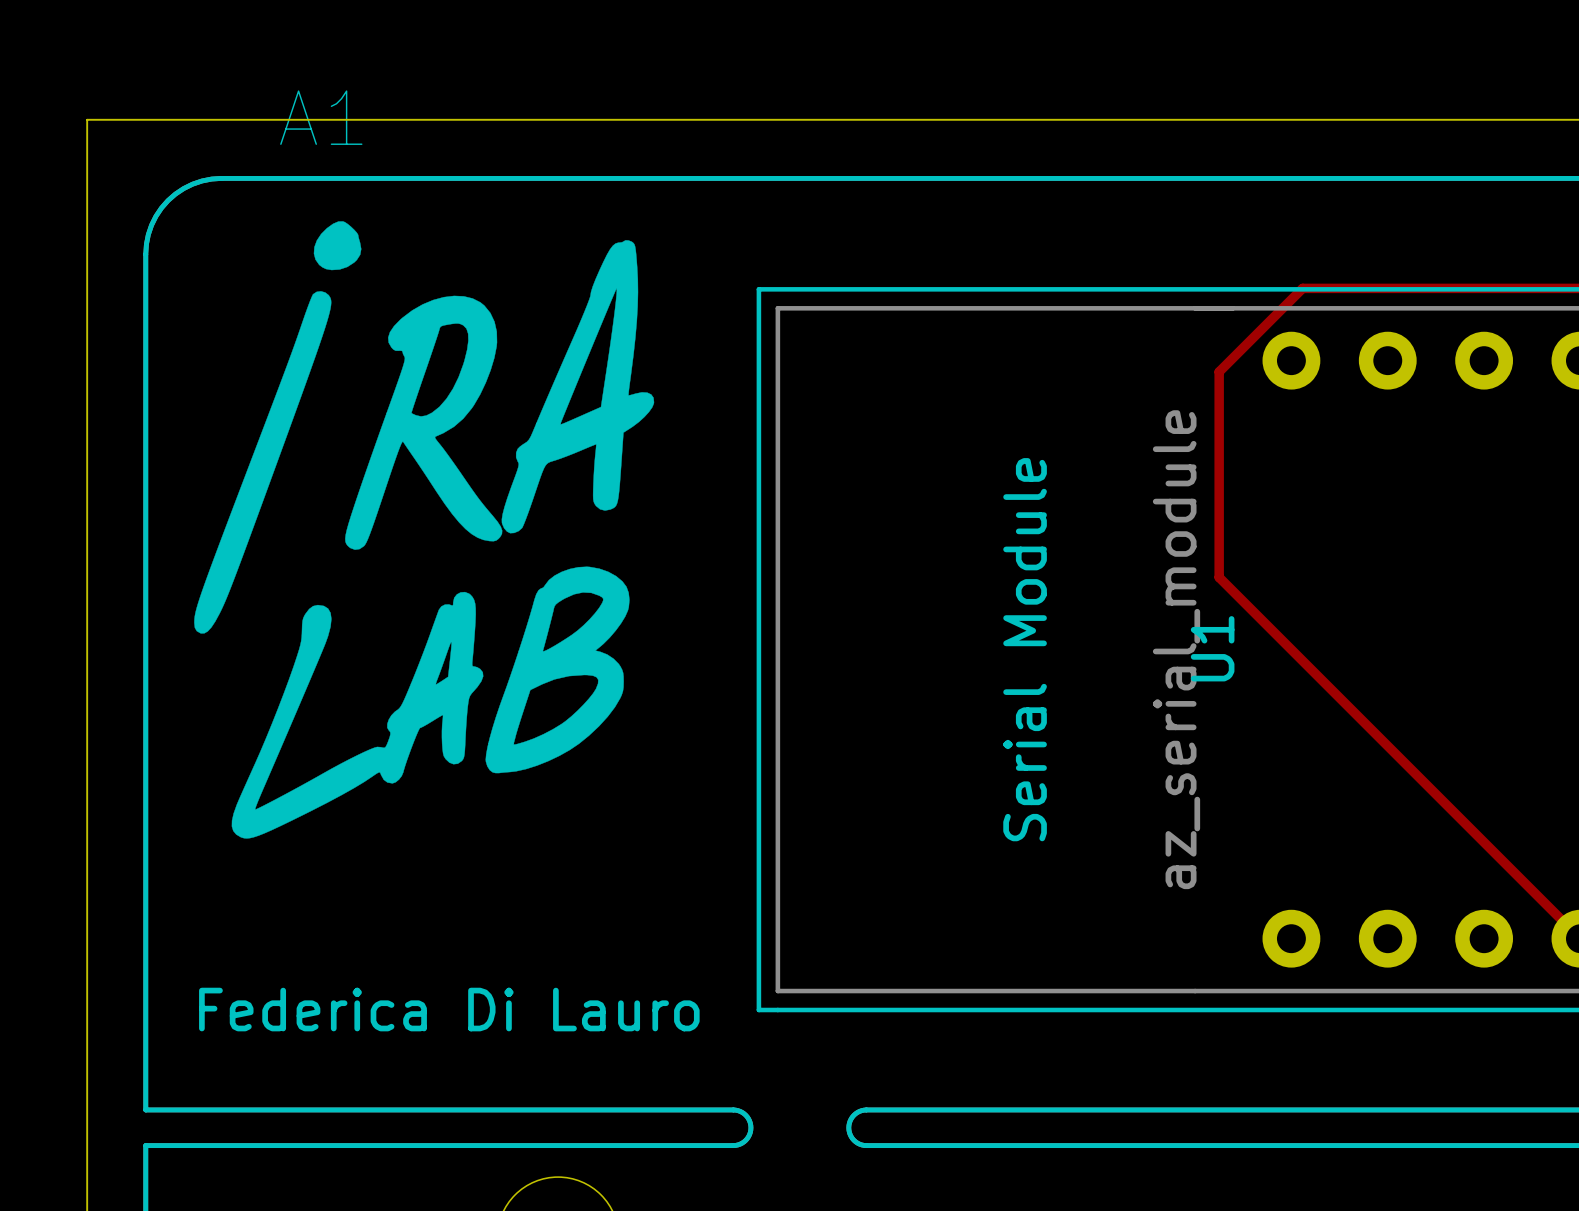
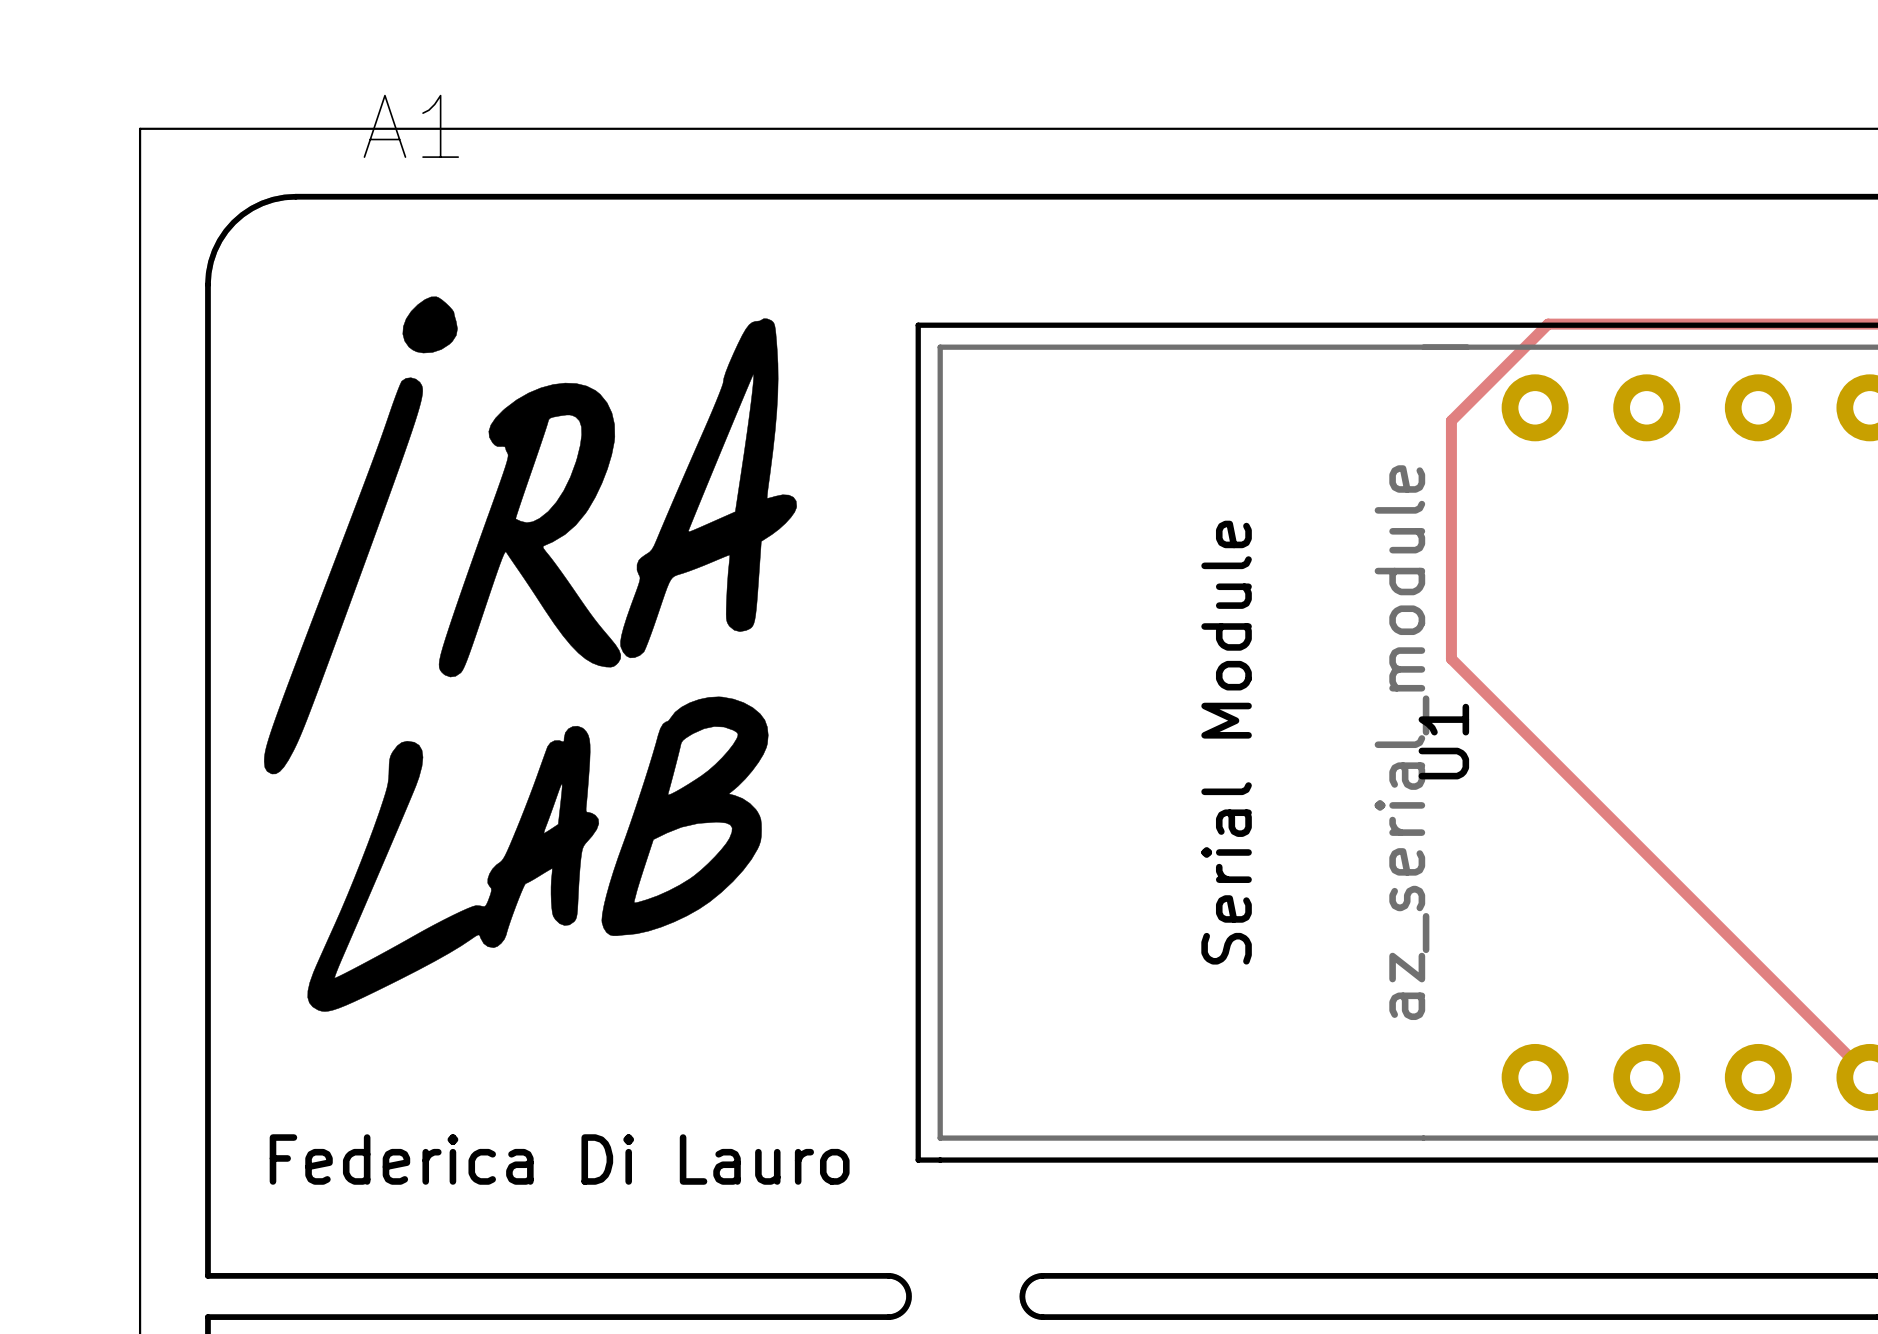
drawing position: (424, 529) -> (530, 654)

